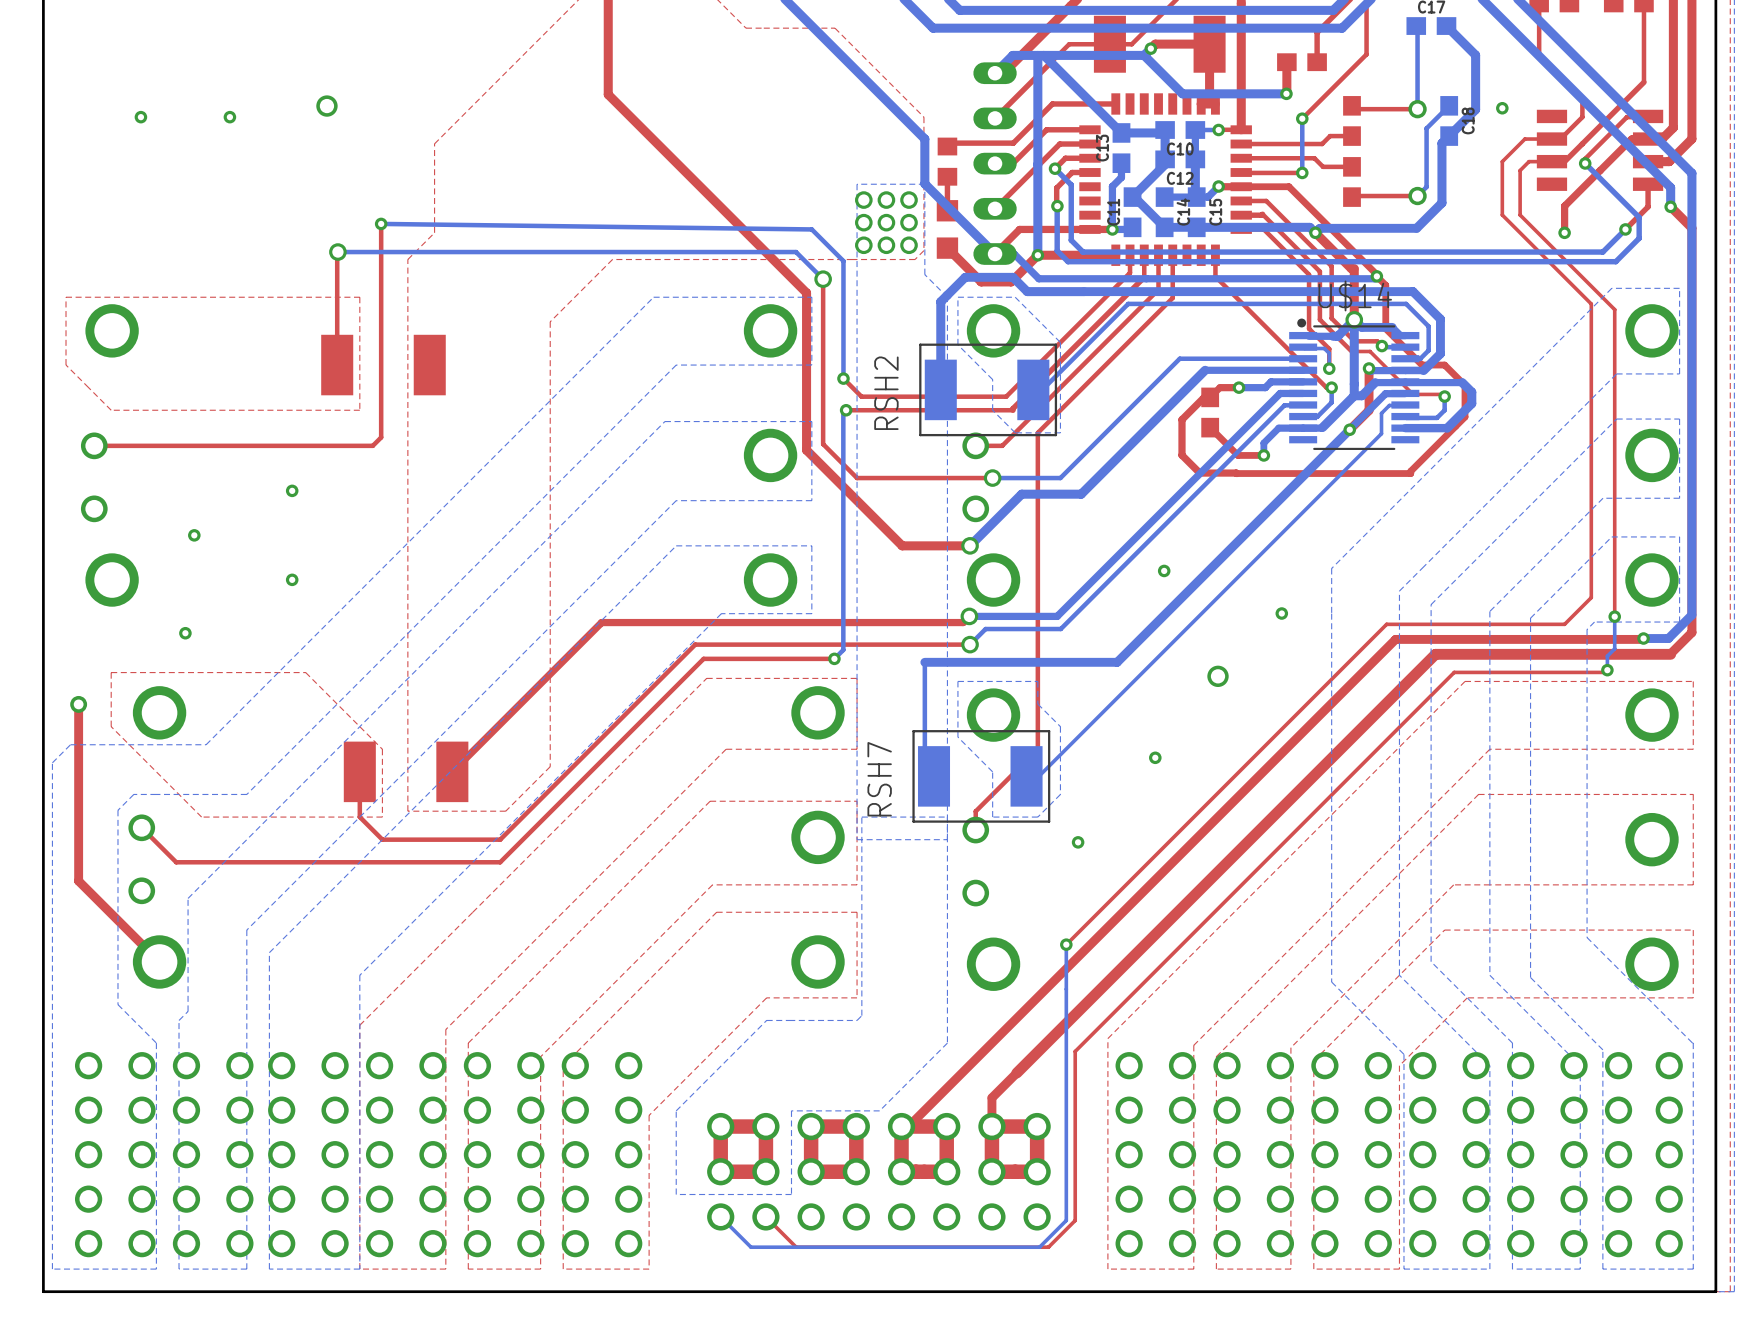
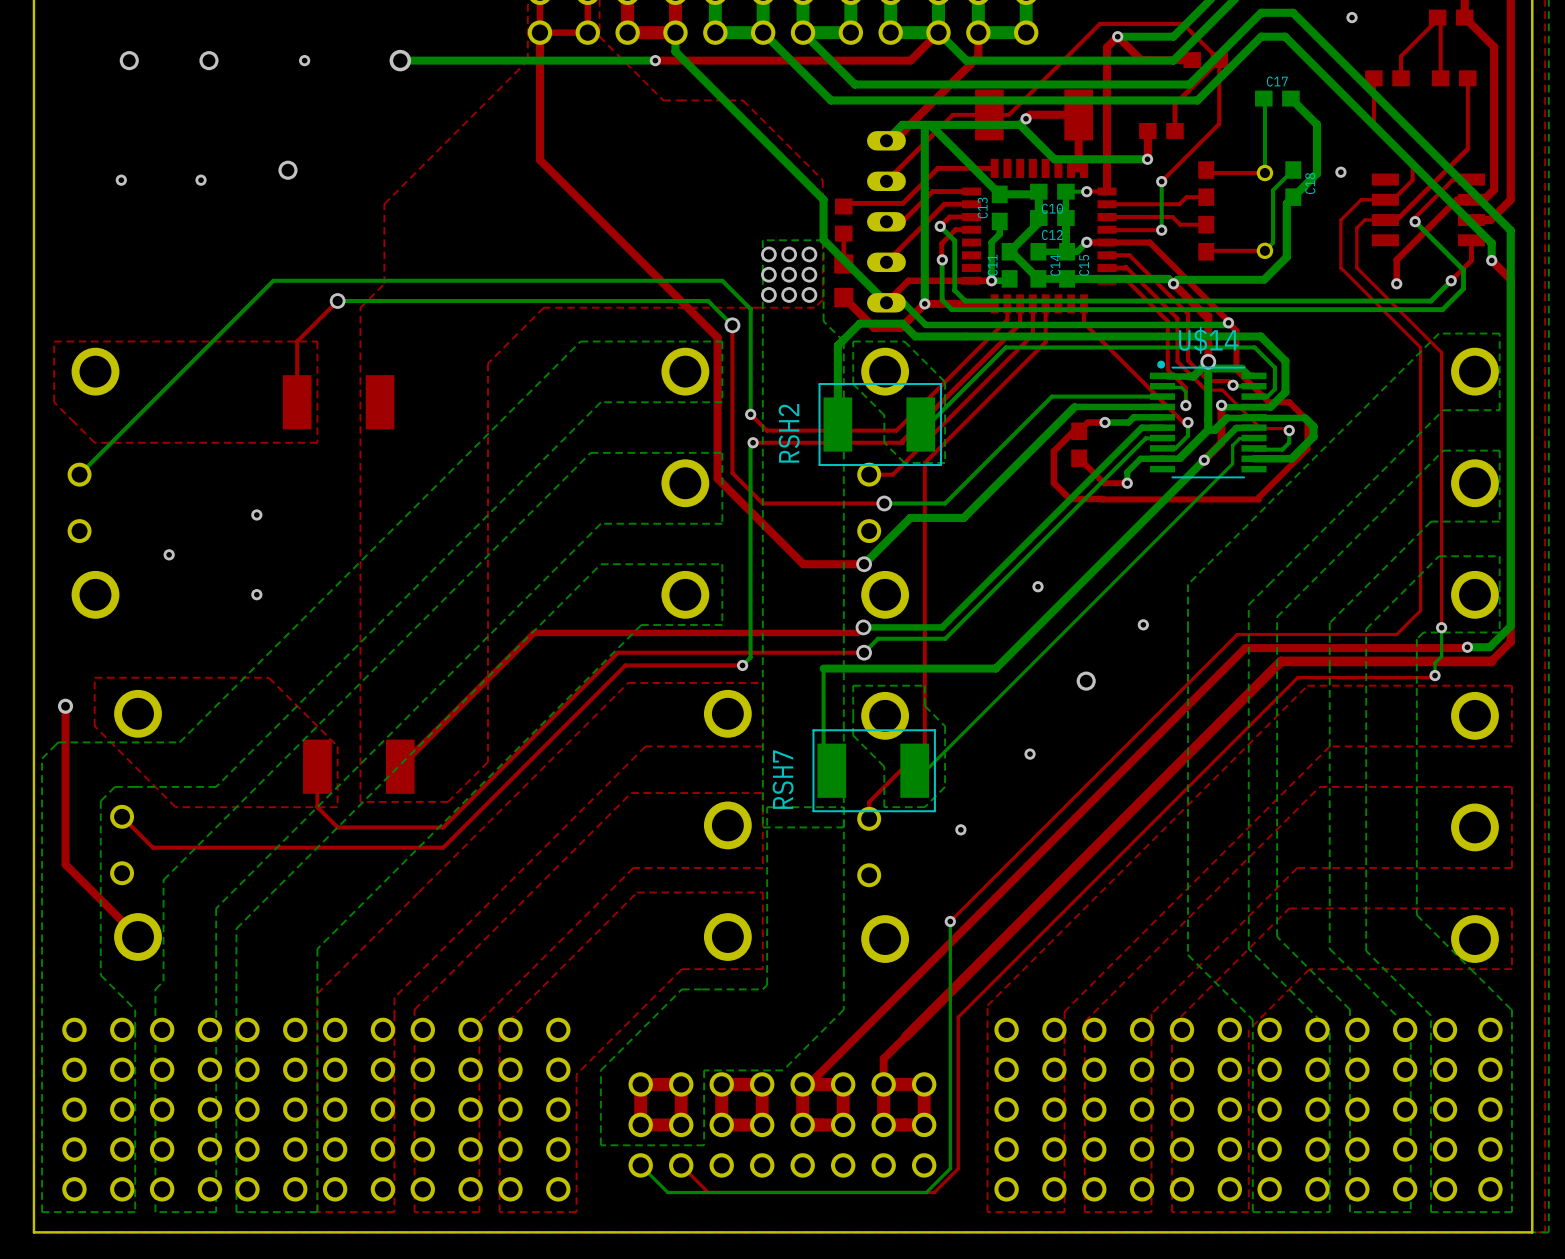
top track: (381, 223) (381, 437) (372, 445) (94, 445) -> none
bottom track: (381, 223) (811, 229) -> (79, 474) (273, 280) (722, 280)
via: (381, 223) -> none
top track: (337, 252) (337, 297) -> (337, 301) (297, 341)
via position: (337, 252) -> (337, 301)
bottom track: (382, 252) (337, 252) -> none
via: (185, 633) -> none

